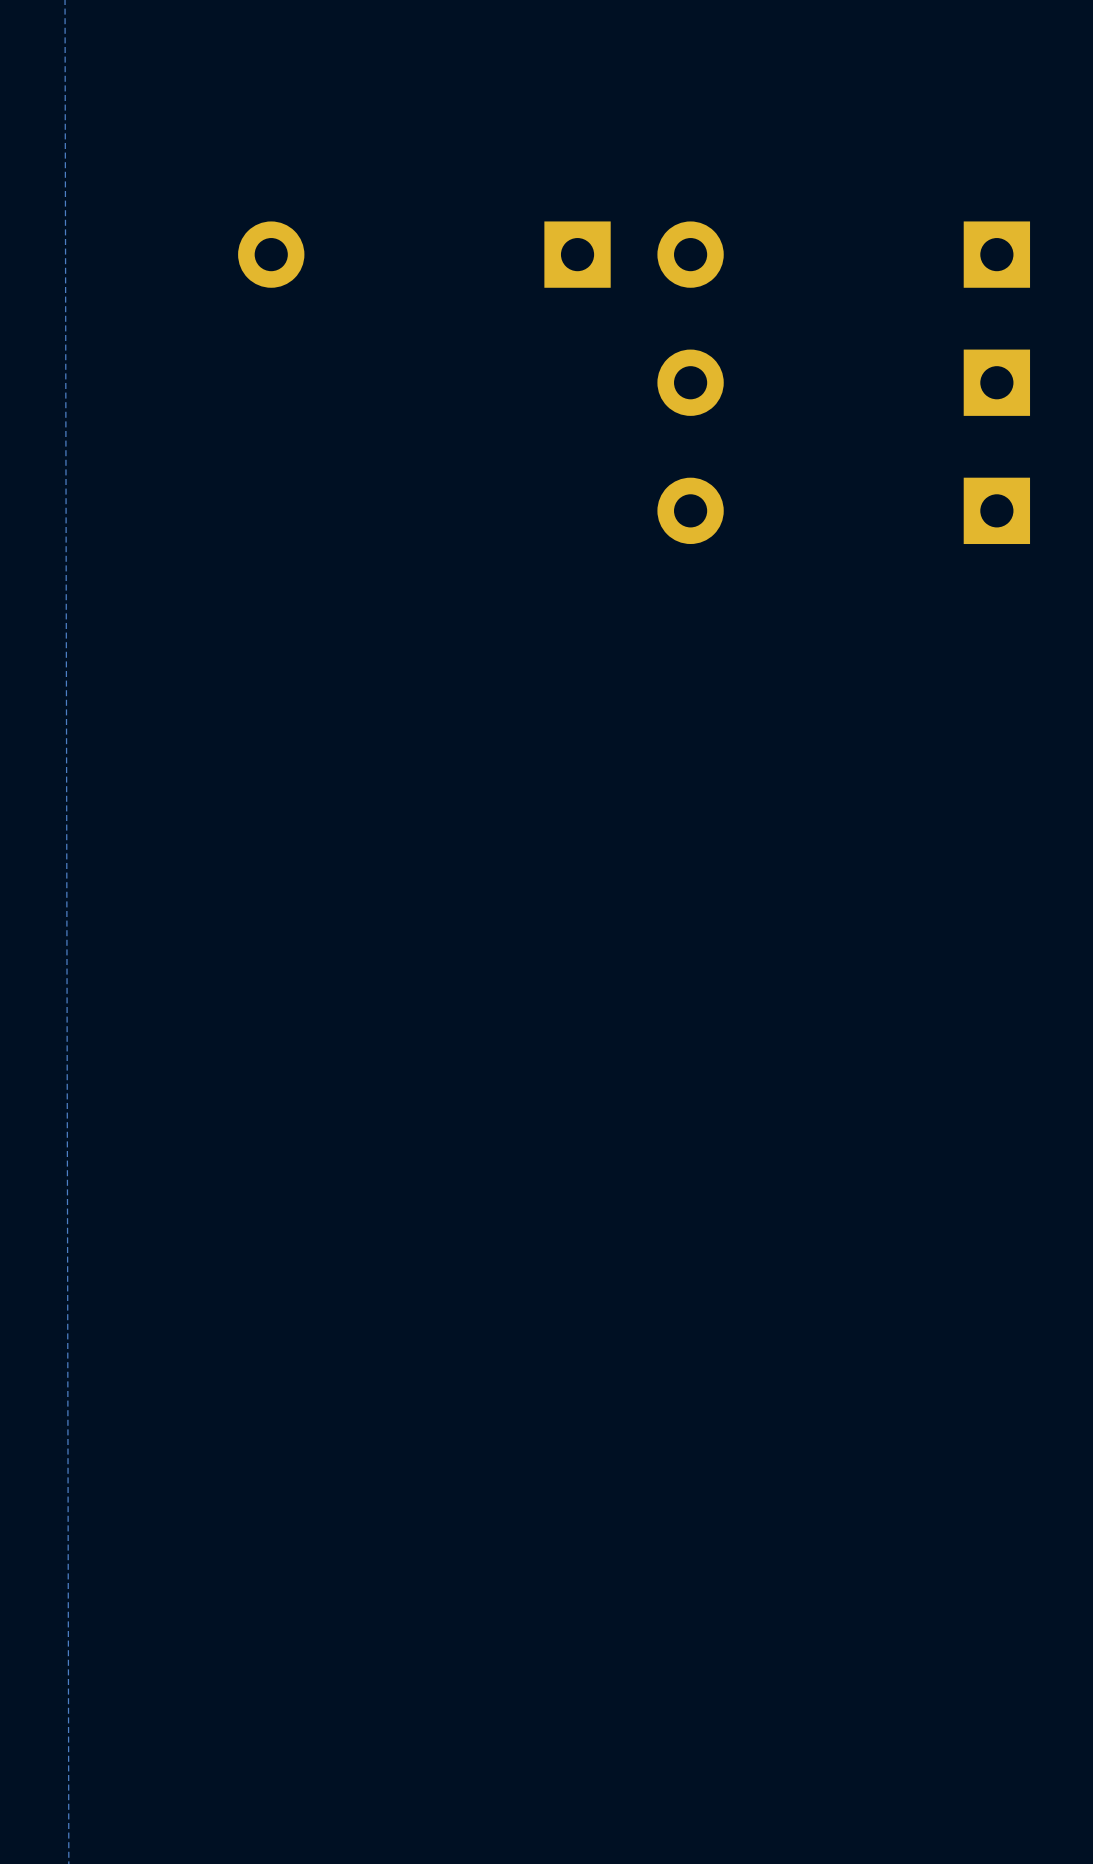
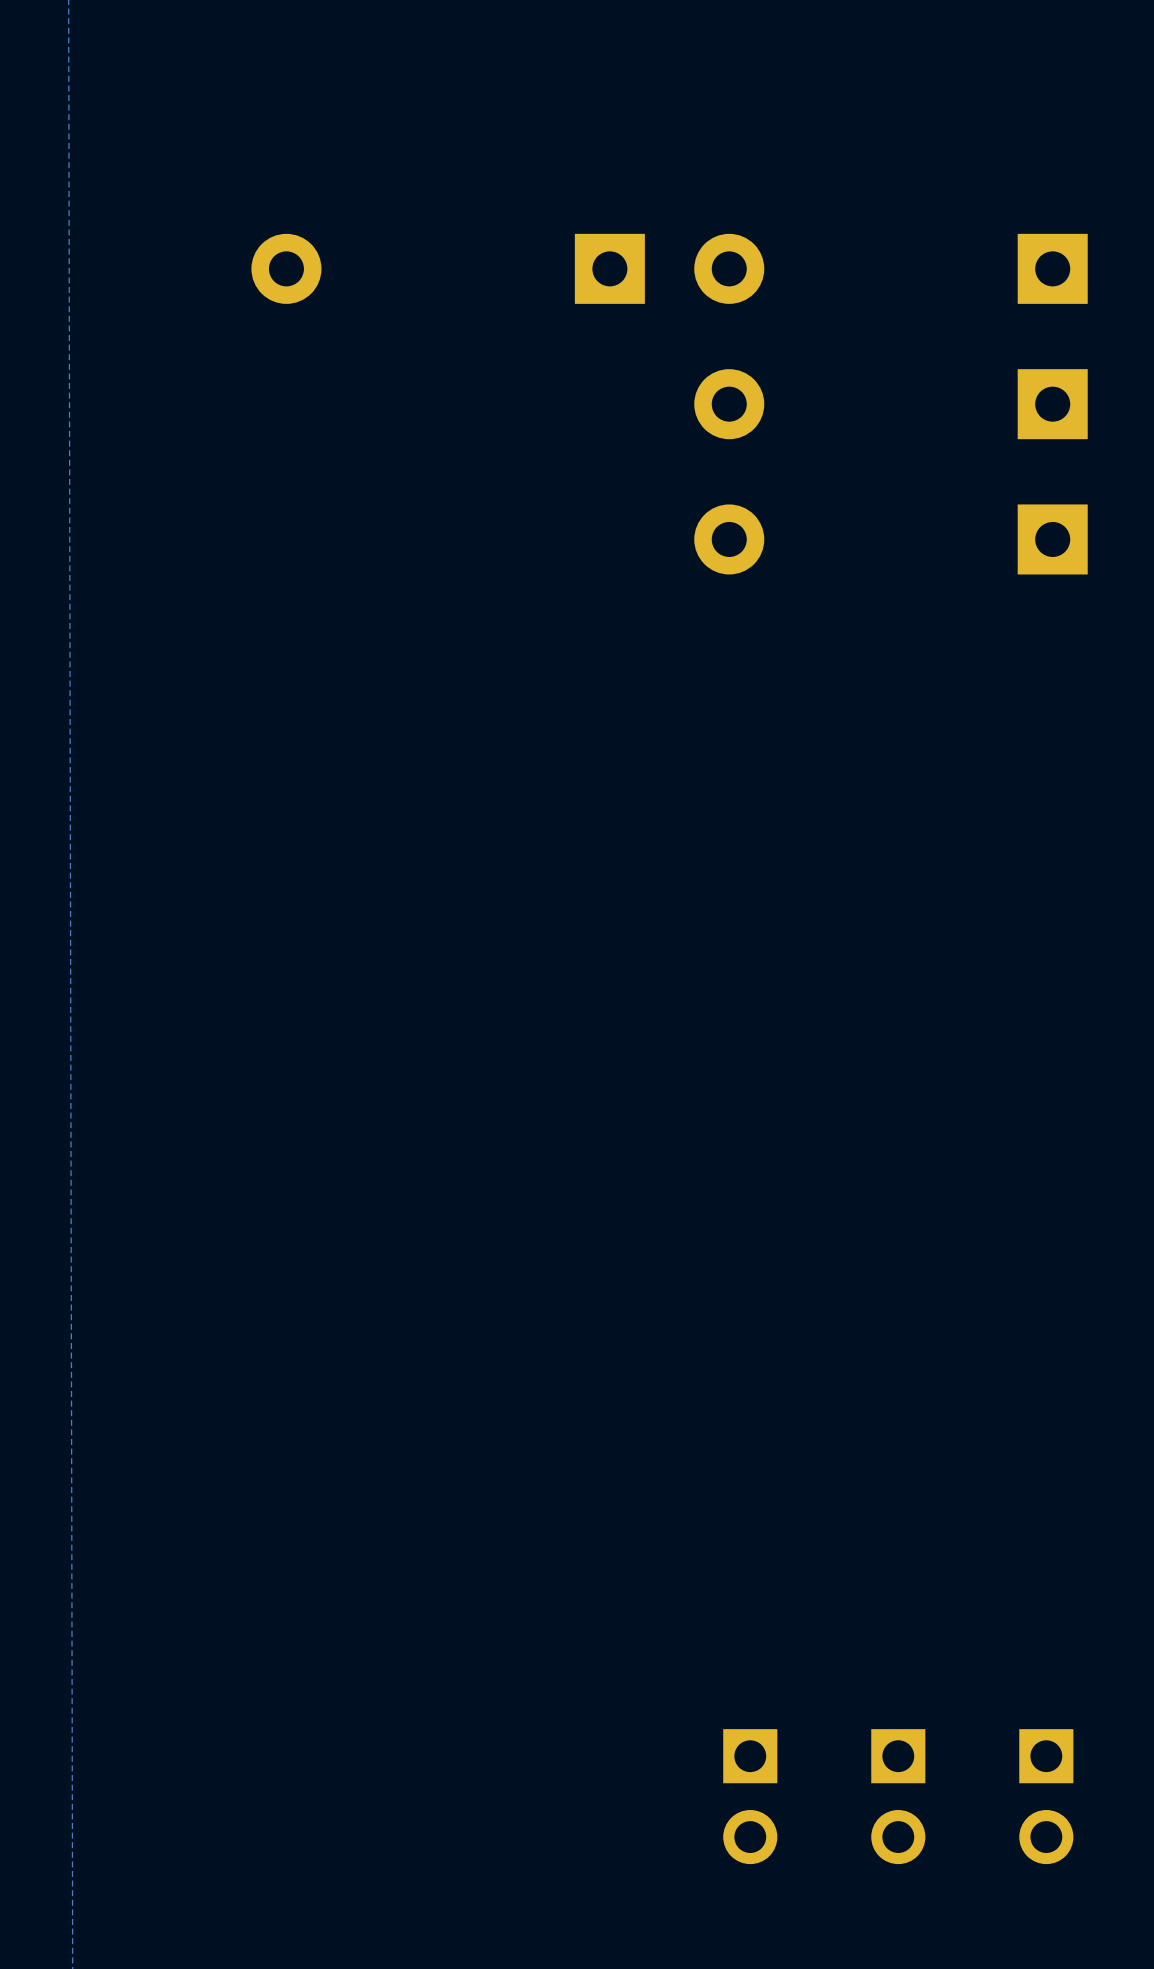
part: none -> (750, 1796)
part: none -> (898, 1796)
part: none -> (1046, 1796)

